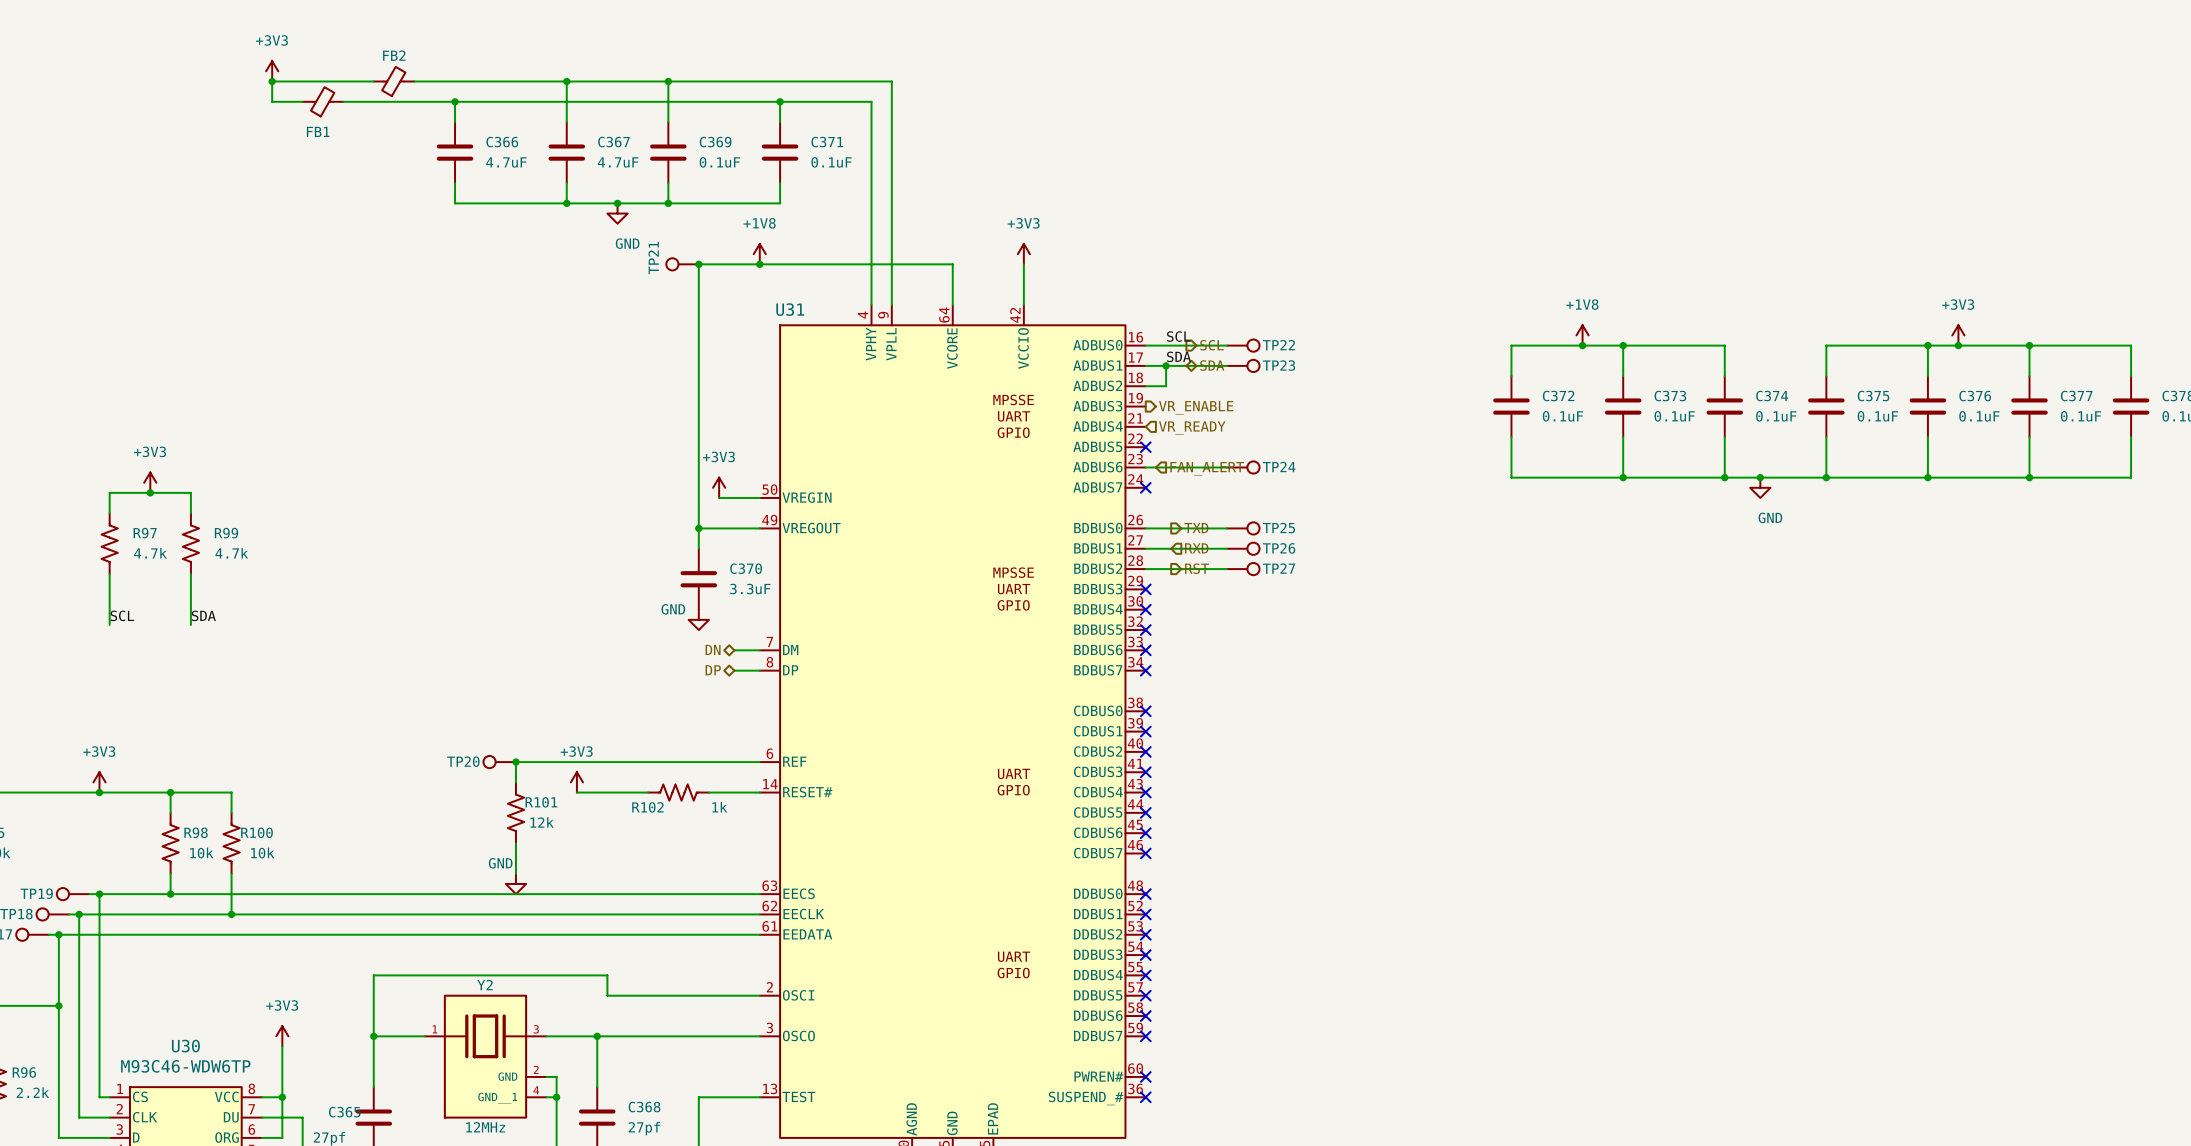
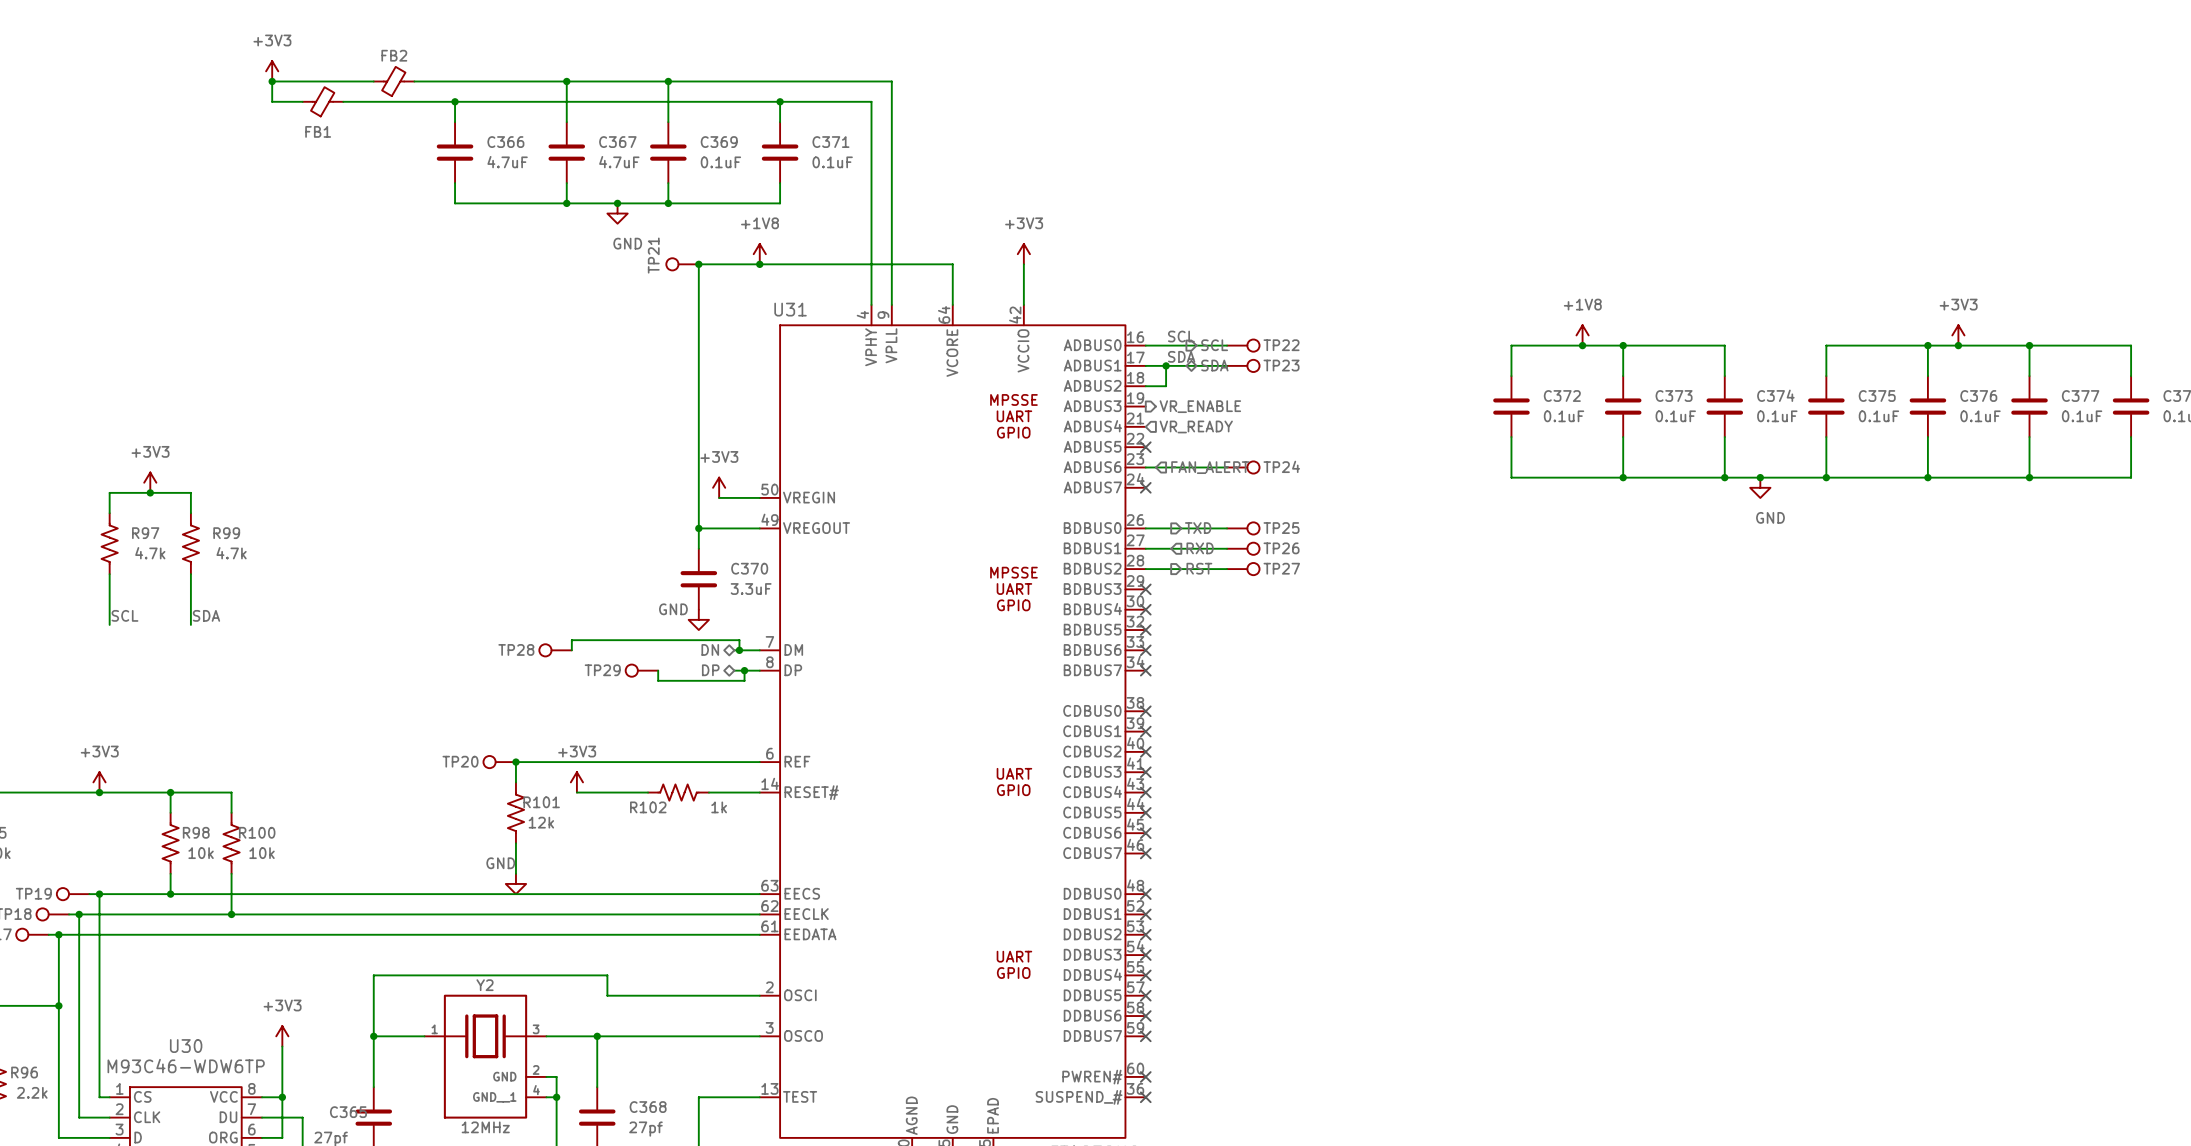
TP28: none -> (555, 650)
wire: none -> (571, 650) (571, 640) (739, 640) (739, 650)
junction: none -> (739, 650)
TP29: none -> (641, 670)
wire: none -> (658, 670) (658, 680) (744, 680) (744, 670)
junction: none -> (744, 670)

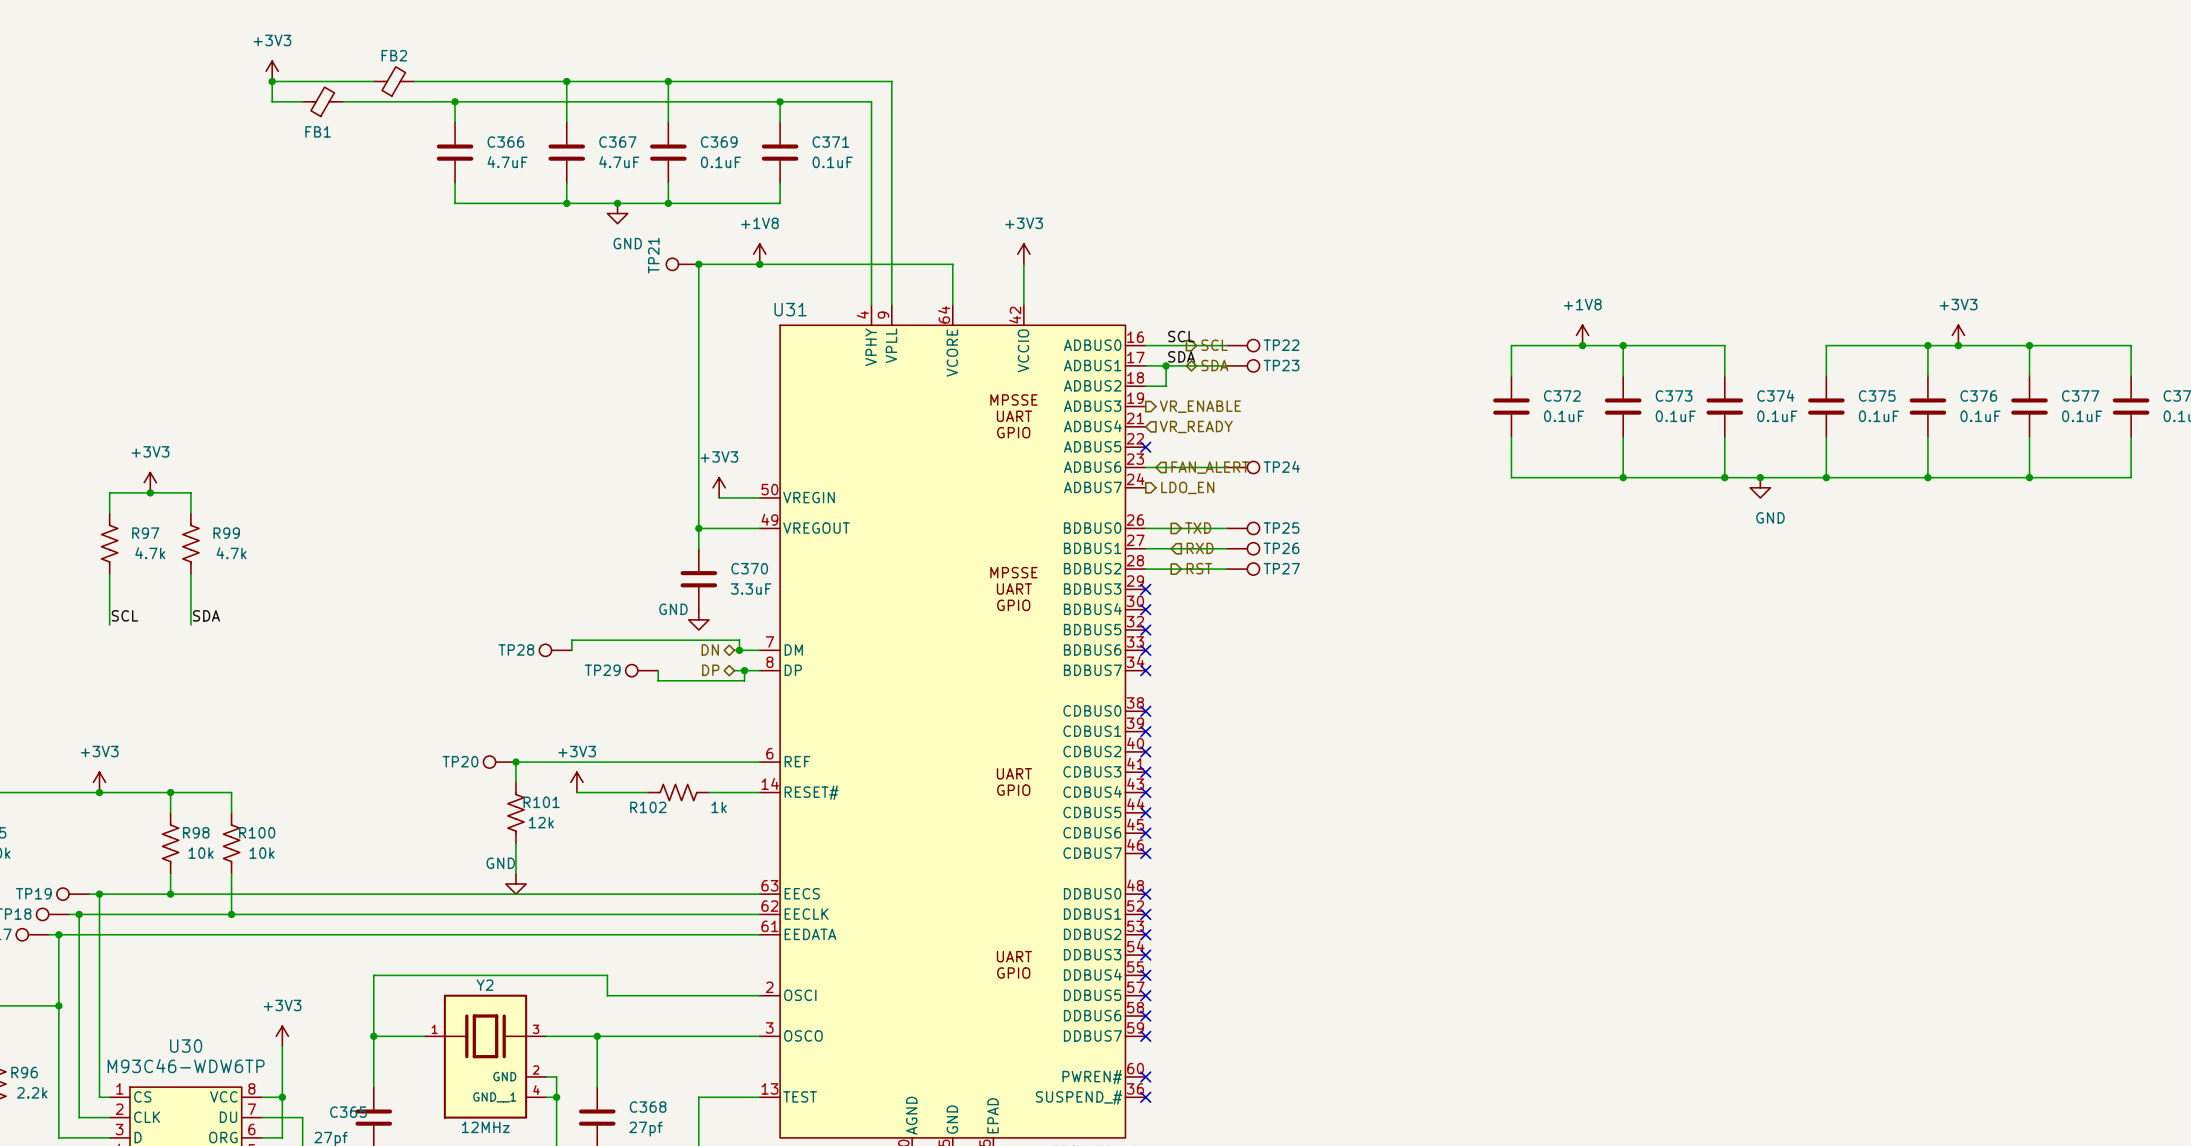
no-connect mark: (1145, 487) -> none
hierarchical label: none -> LDO_EN (1187, 487)

